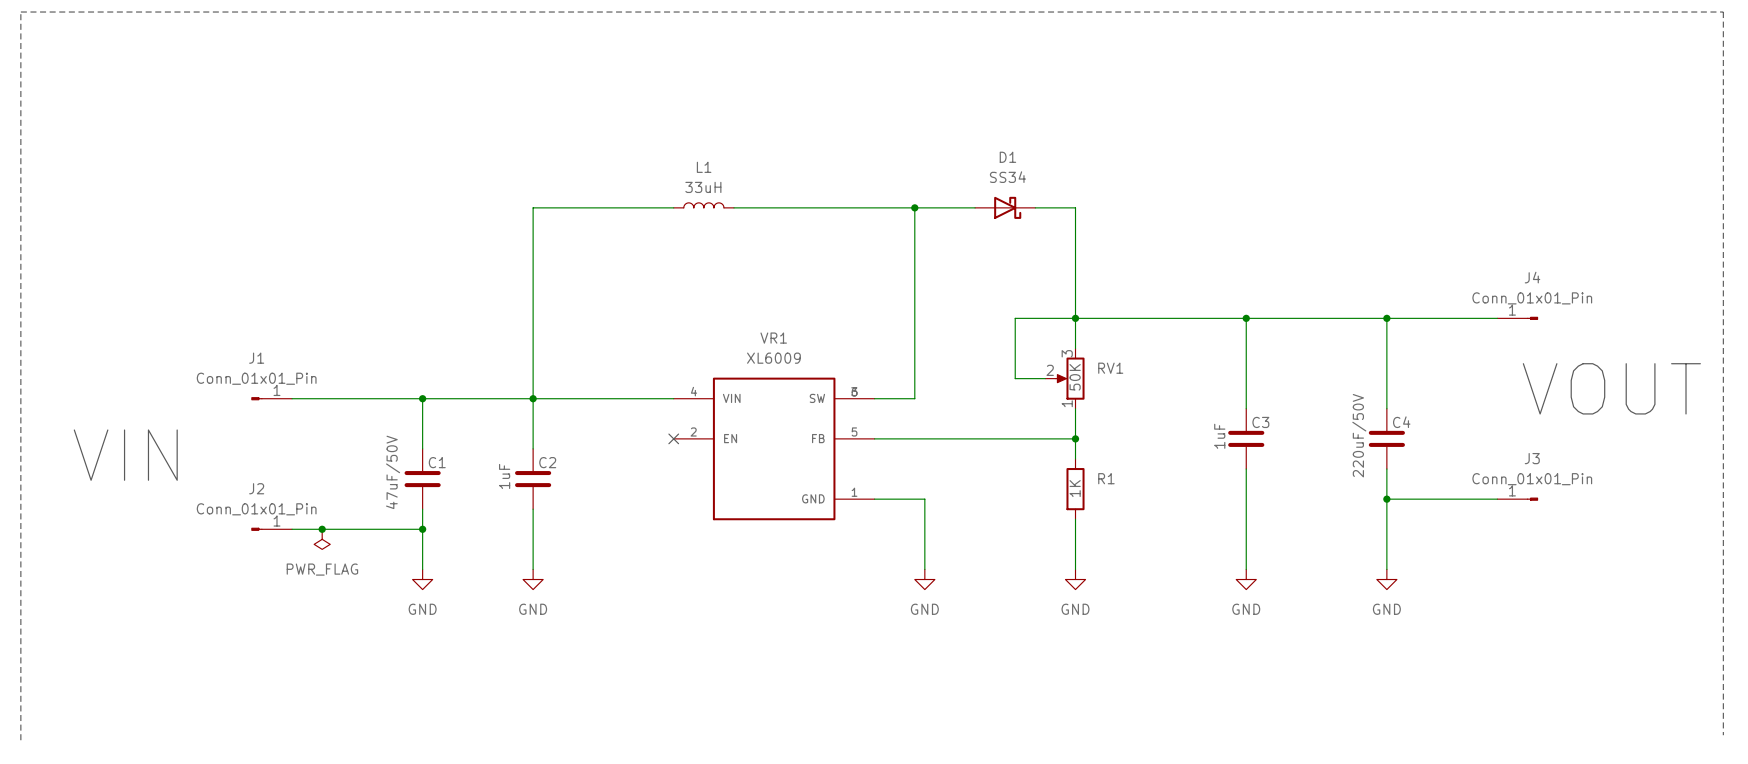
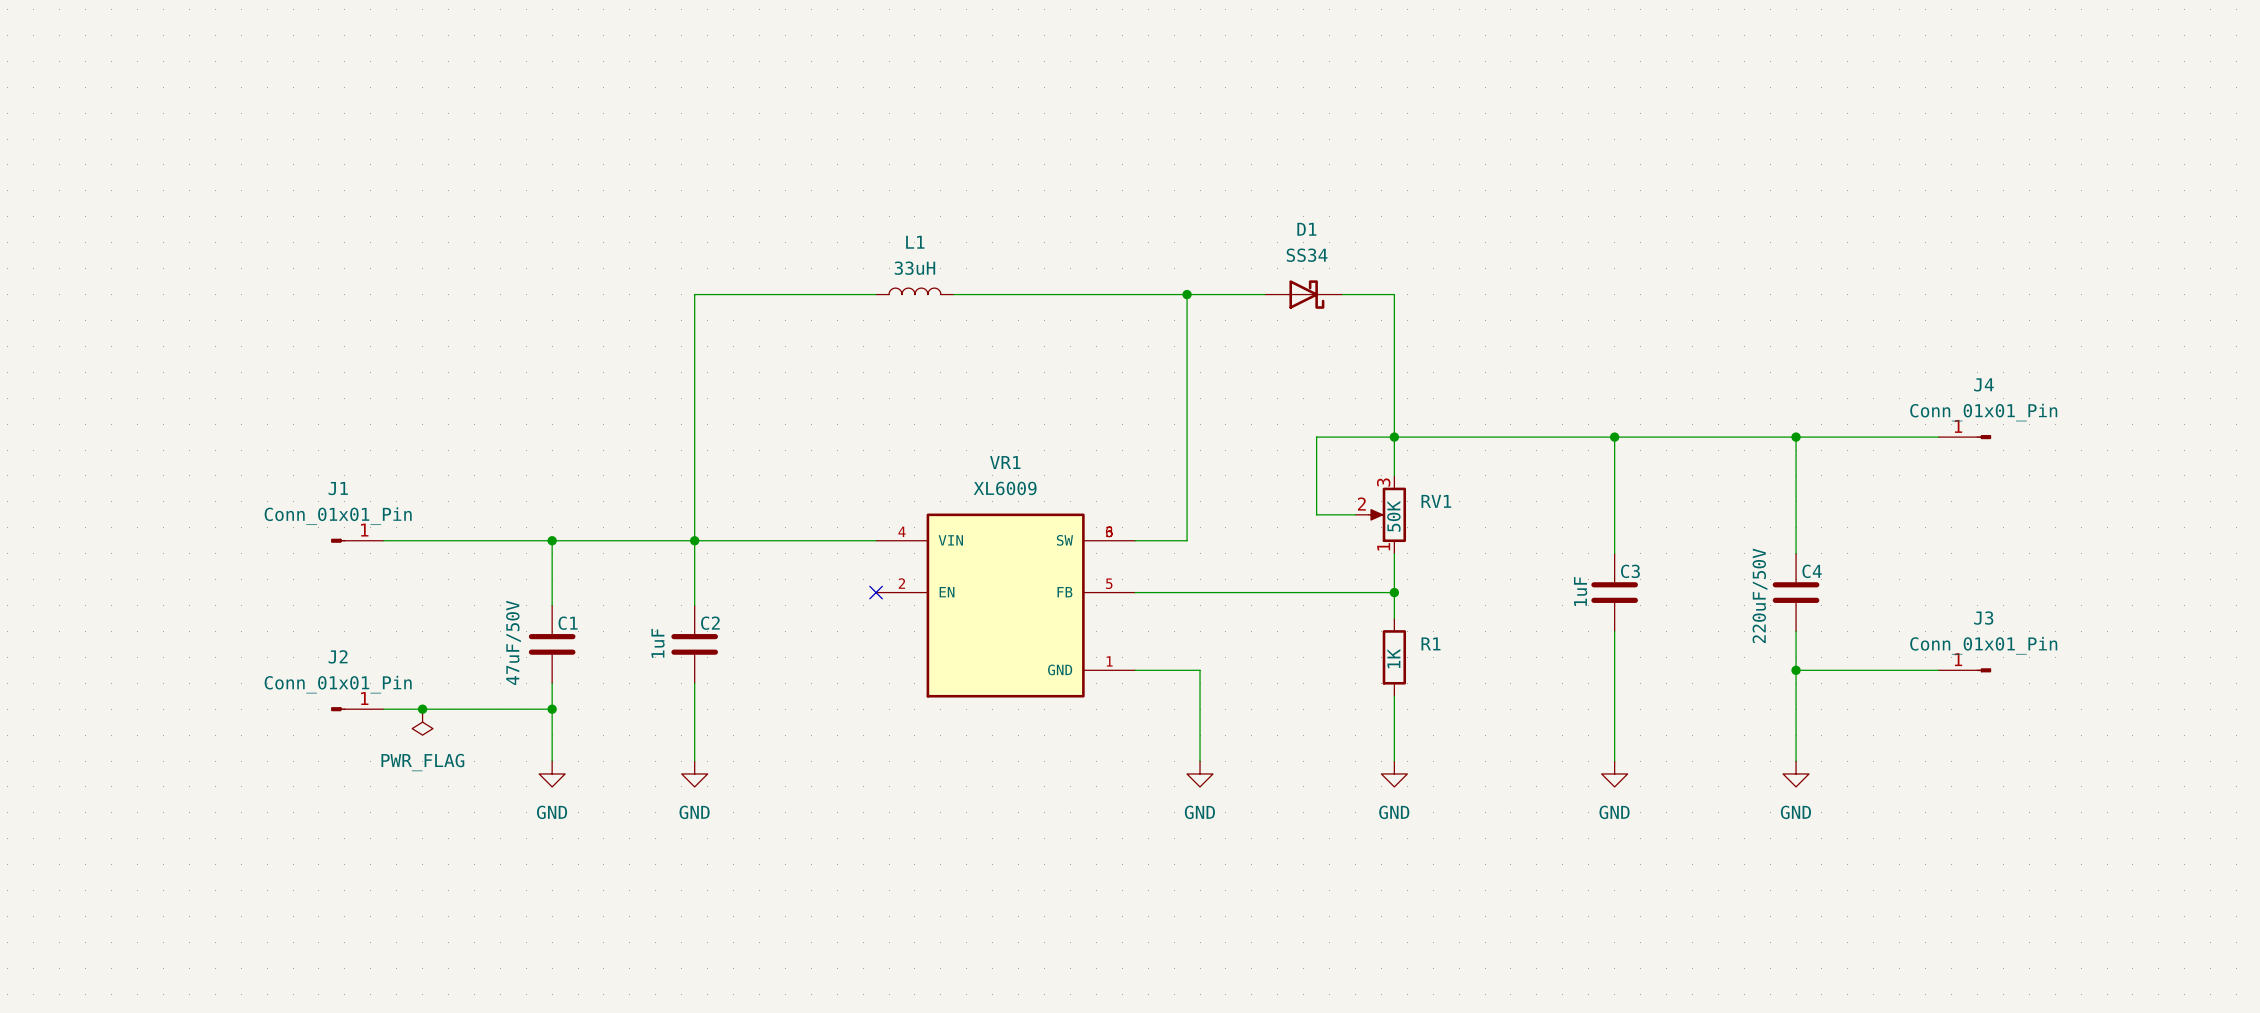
text: VOUT (1611, 388) -> none
text: VIN (125, 455) -> none
line: (1723, 735) (1723, 12) (20, 12) (20, 740) -> none

